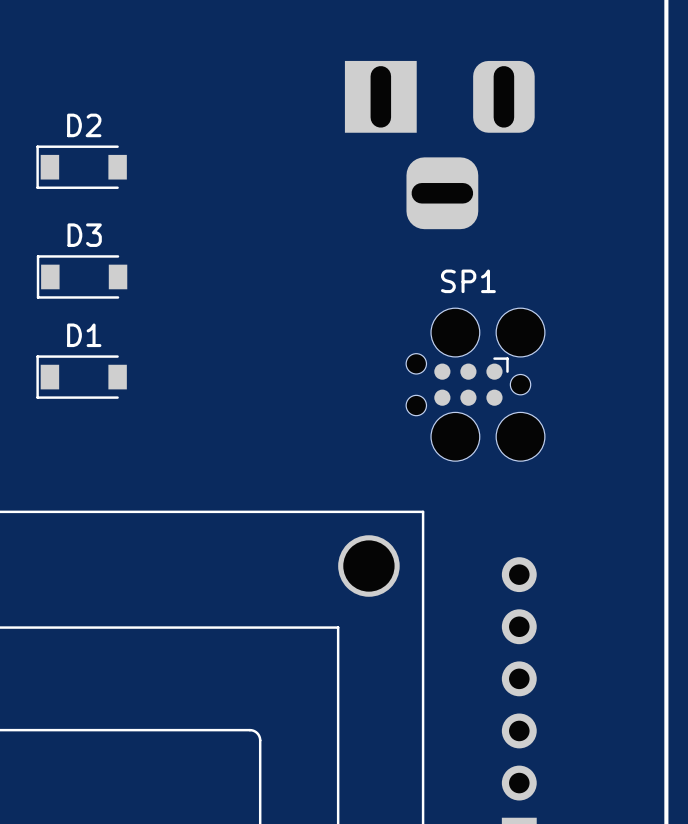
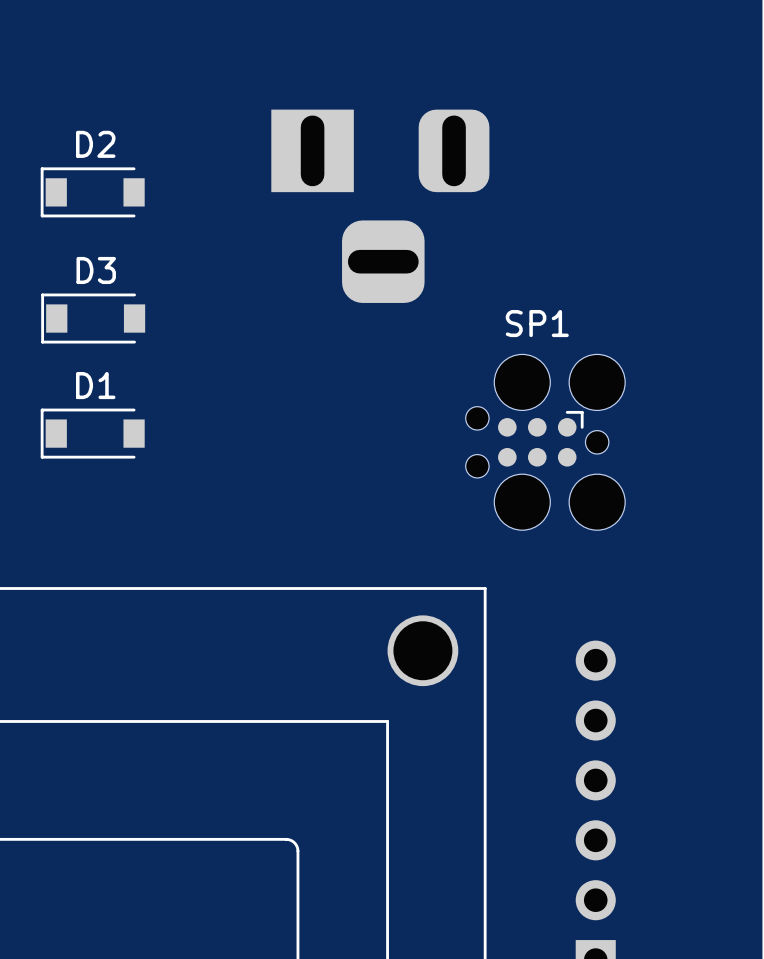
part position: (439, 145) -> (380, 206)

